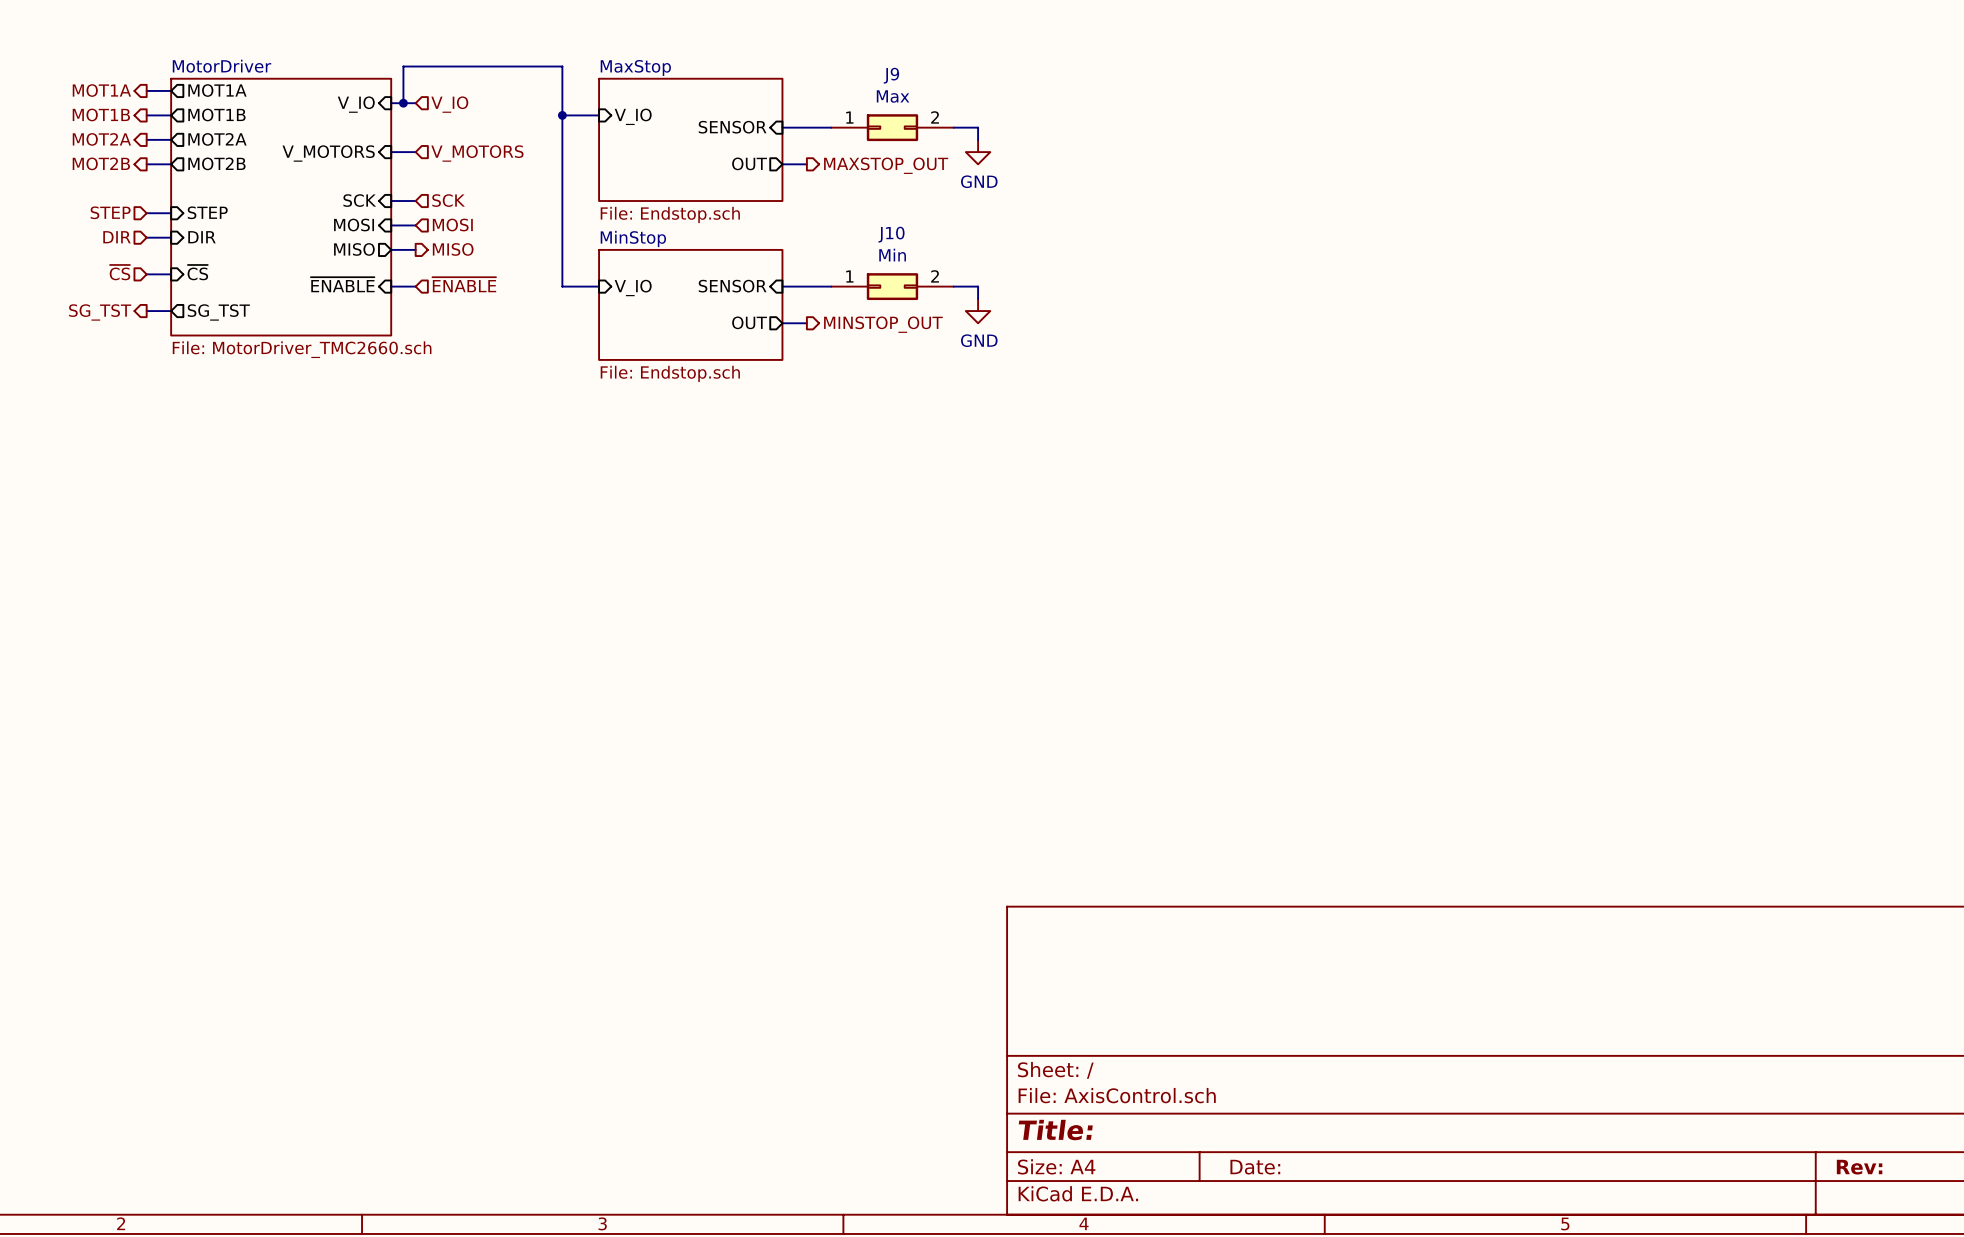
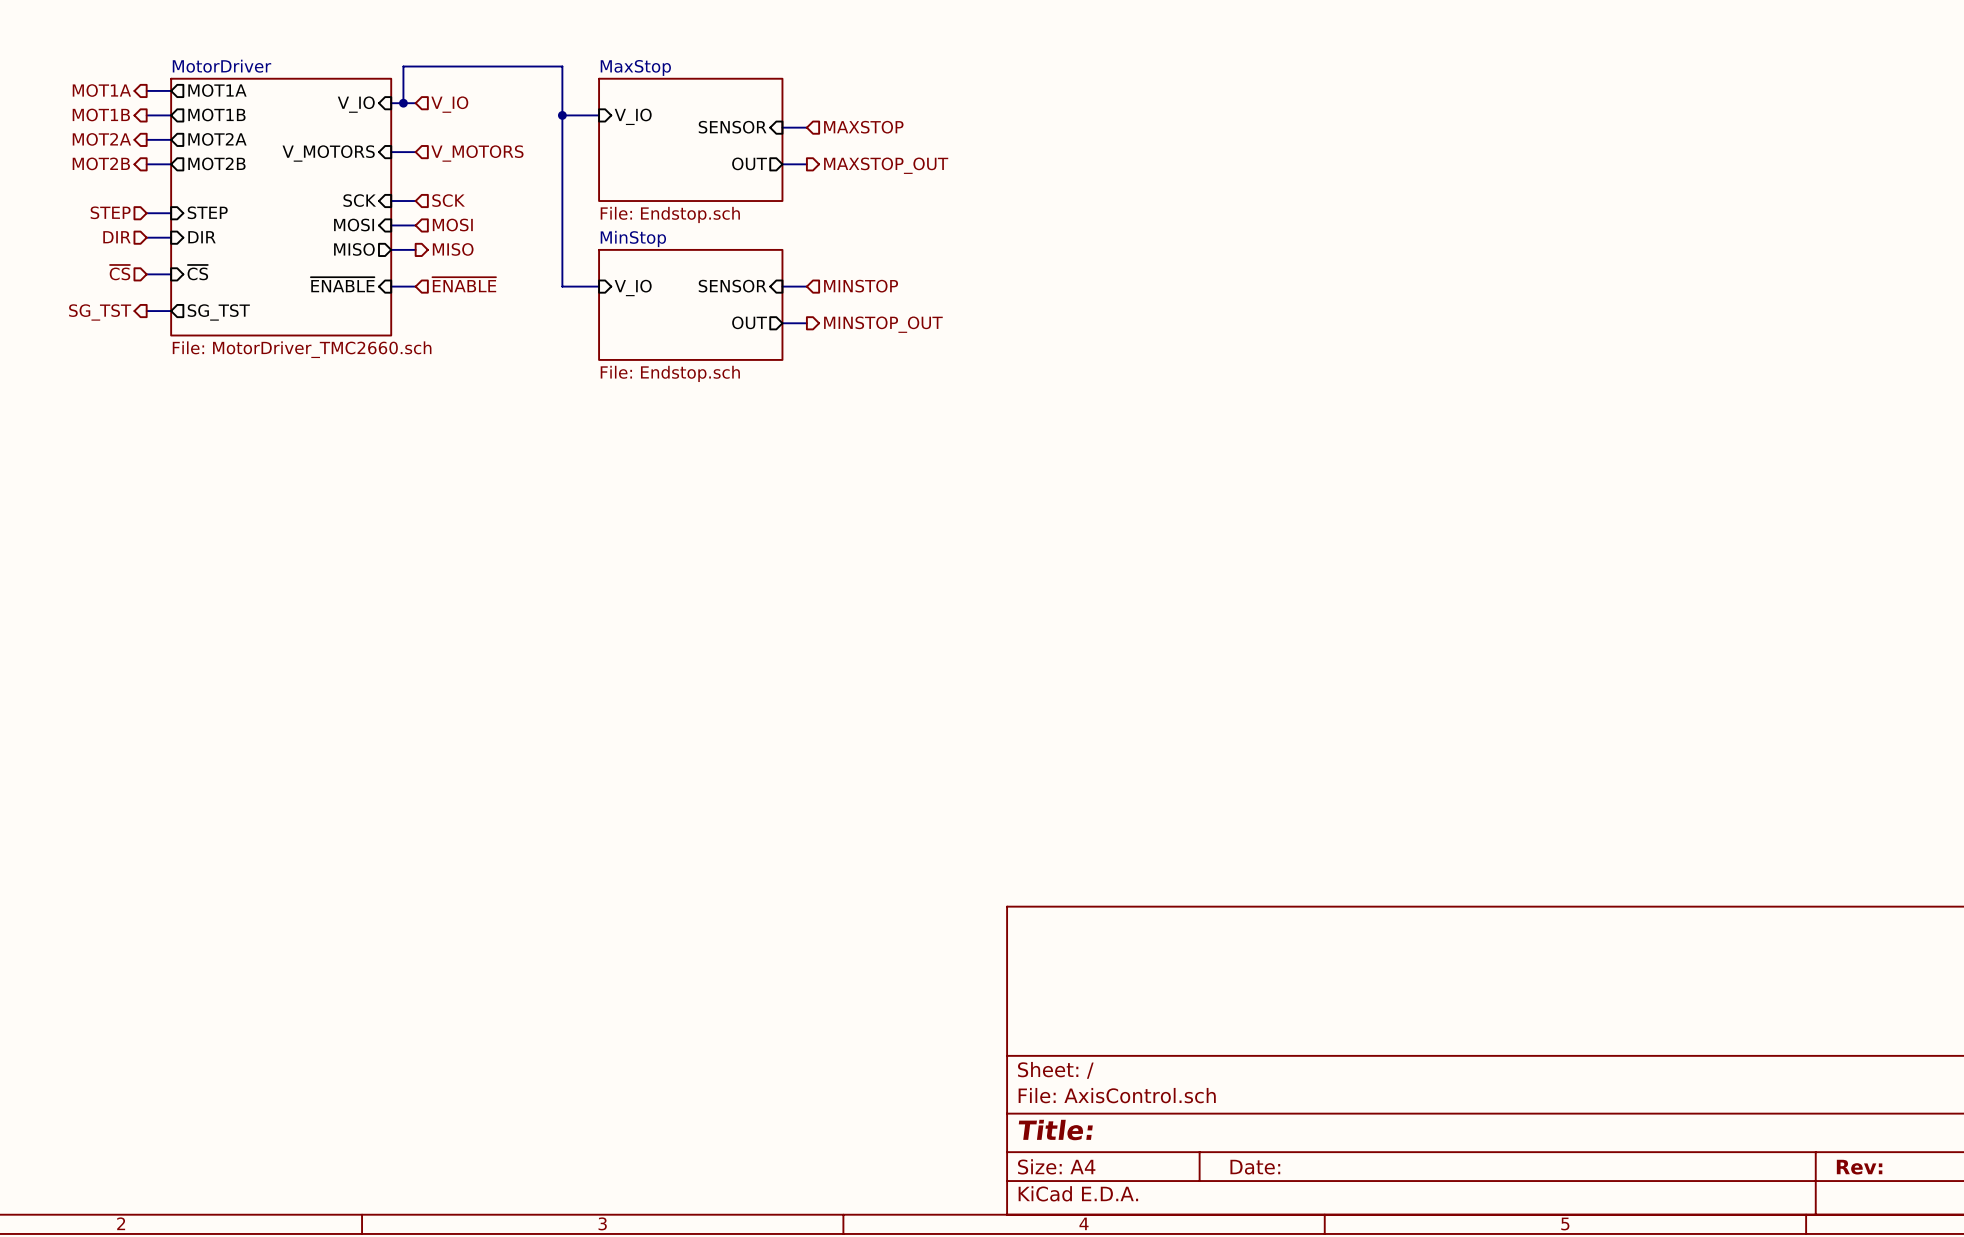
wire: (806, 127) (831, 127) -> none
hierarchical label: none -> MAXSTOP (863, 127)
J9: Max (892, 127) -> none
wire: (953, 127) (978, 127) (978, 139) -> none
power symbol: GND (978, 152) -> none
wire: (806, 286) (831, 286) -> none
hierarchical label: none -> MINSTOP (861, 286)
J10: Min (892, 286) -> none
wire: (953, 286) (978, 286) (978, 298) -> none
power symbol: GND (978, 311) -> none

